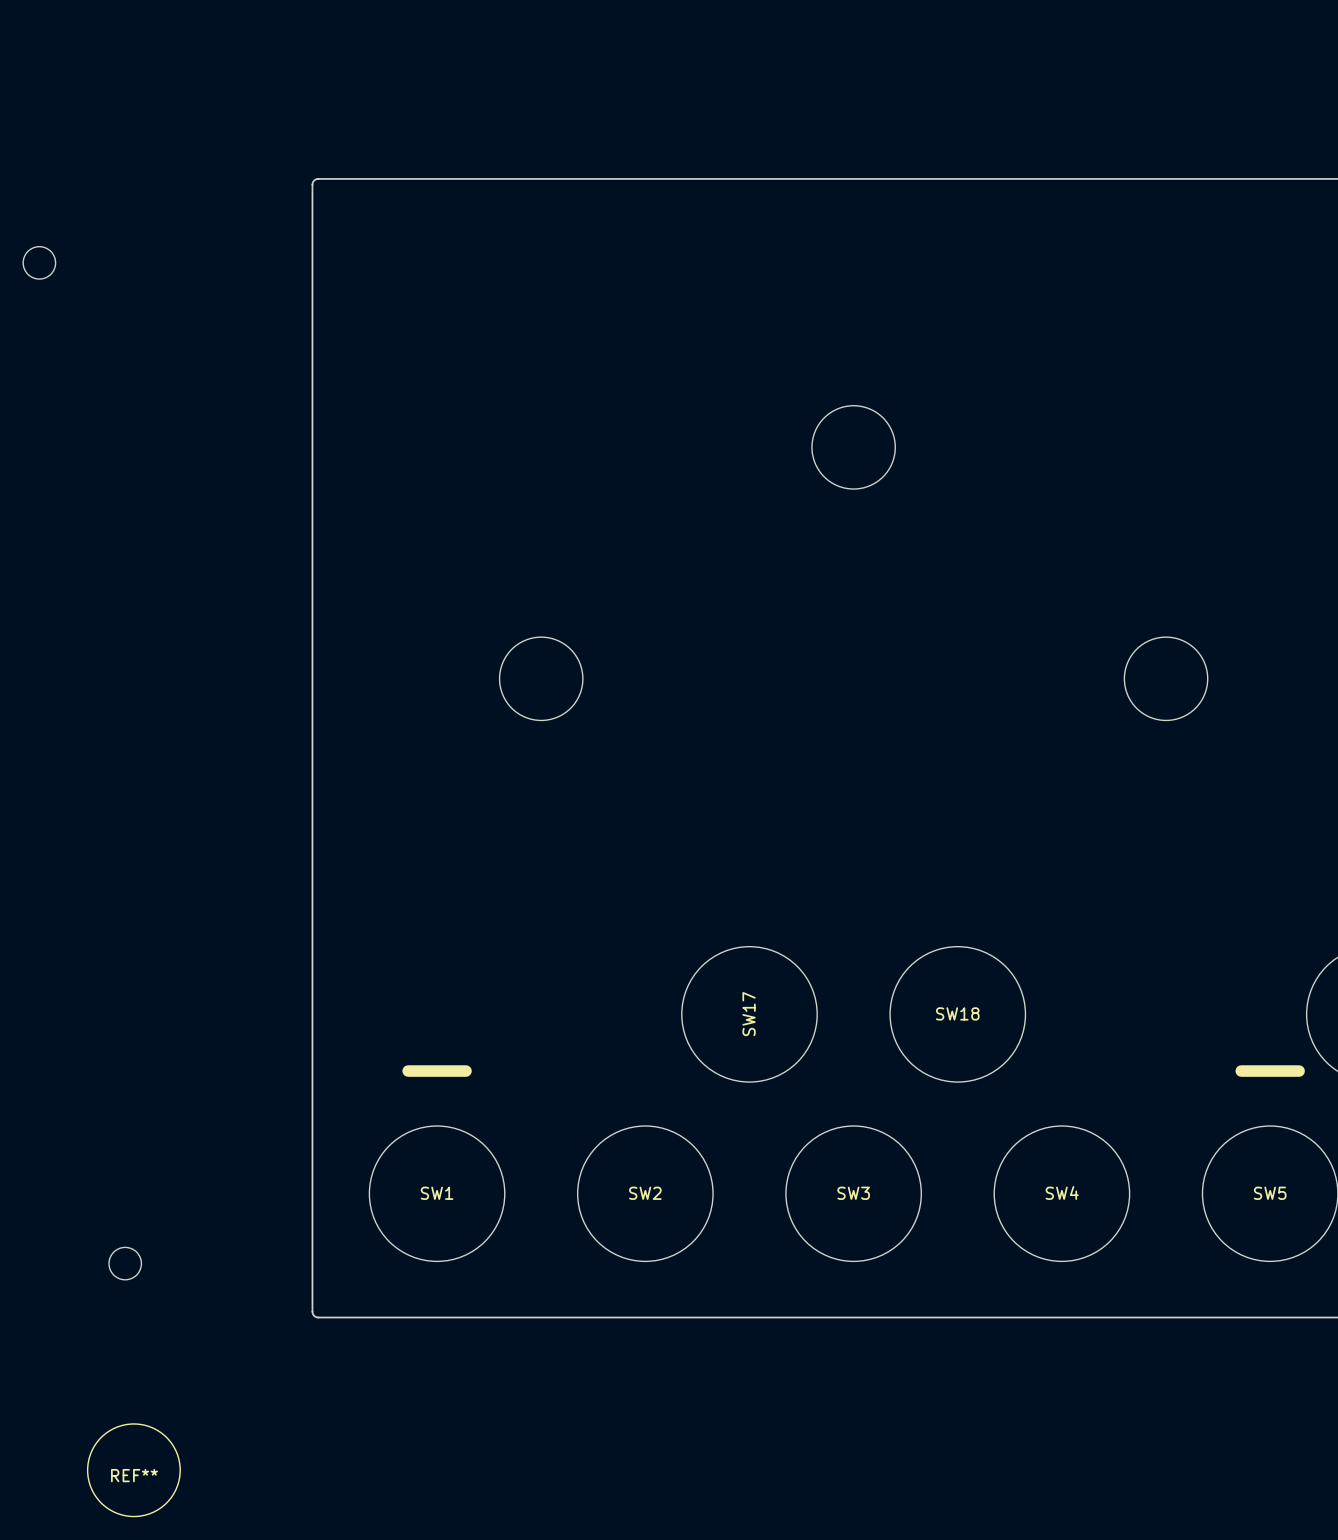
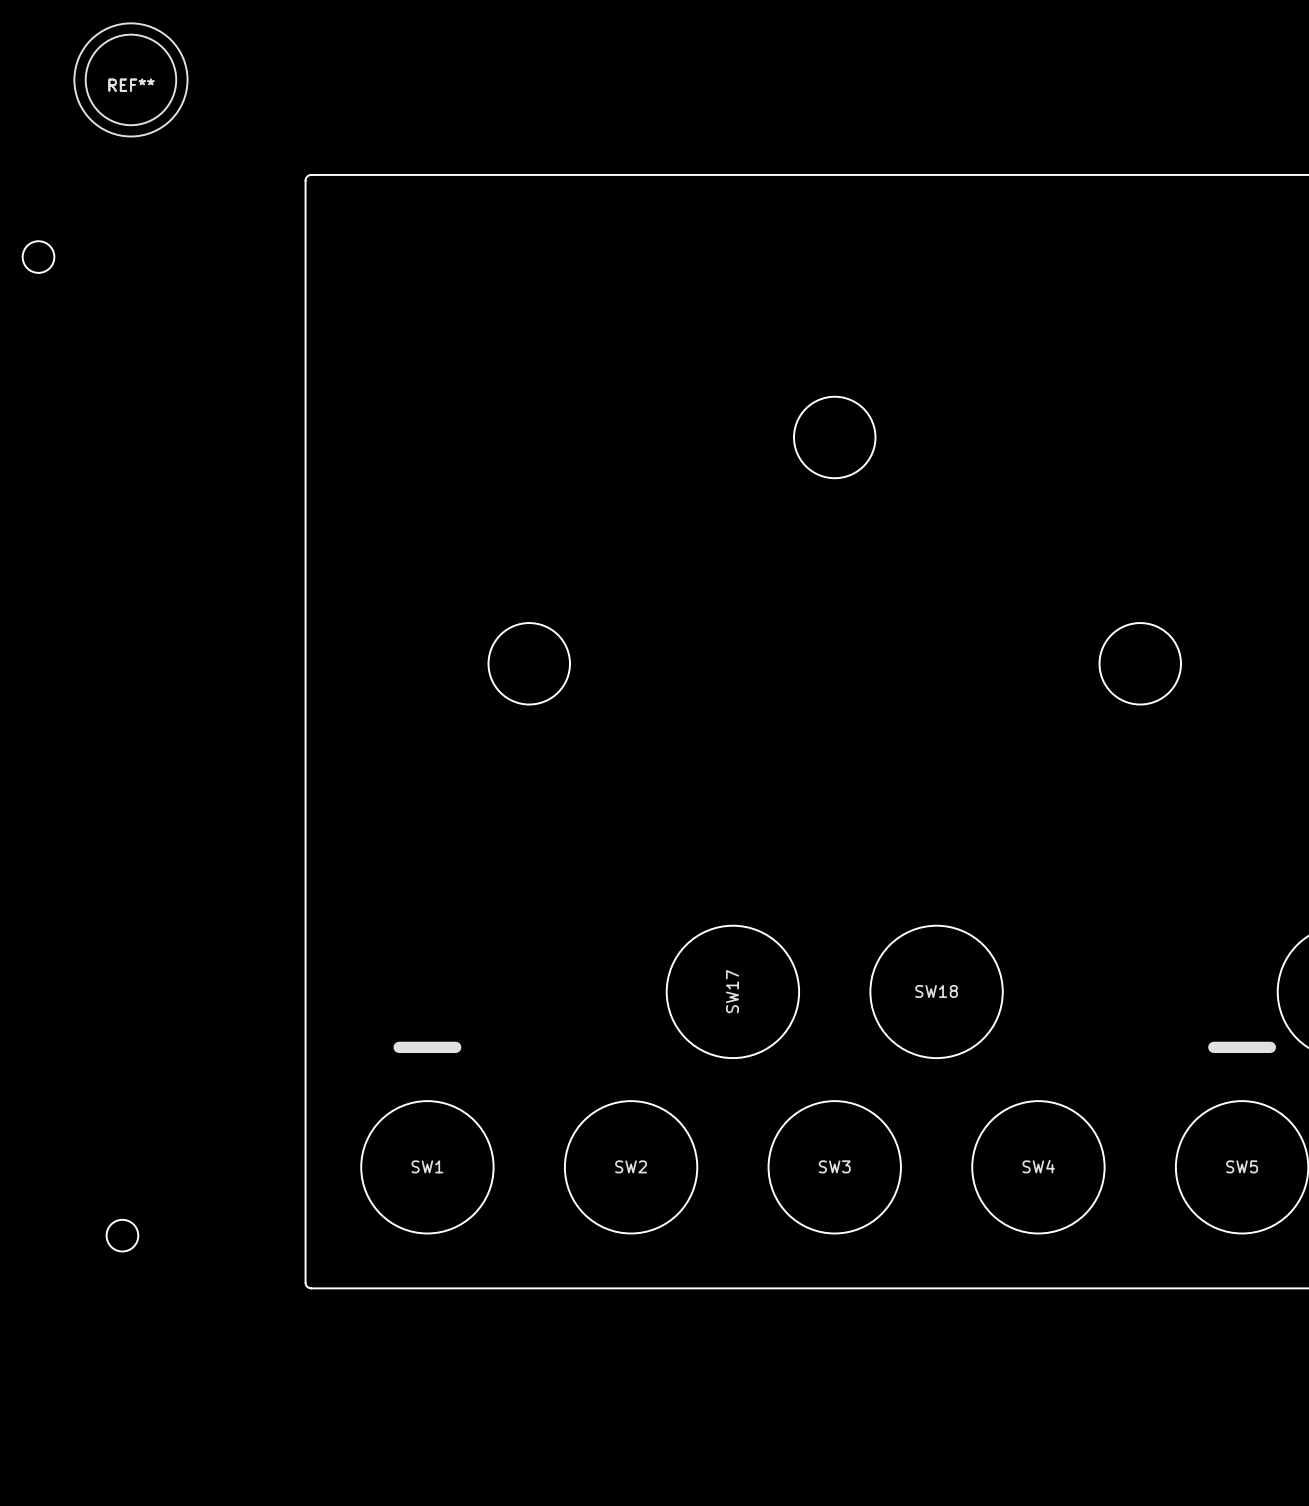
REF**: none -> (130, 79)
REF**: none -> (130, 79)
REF**: (133, 1470) -> none

